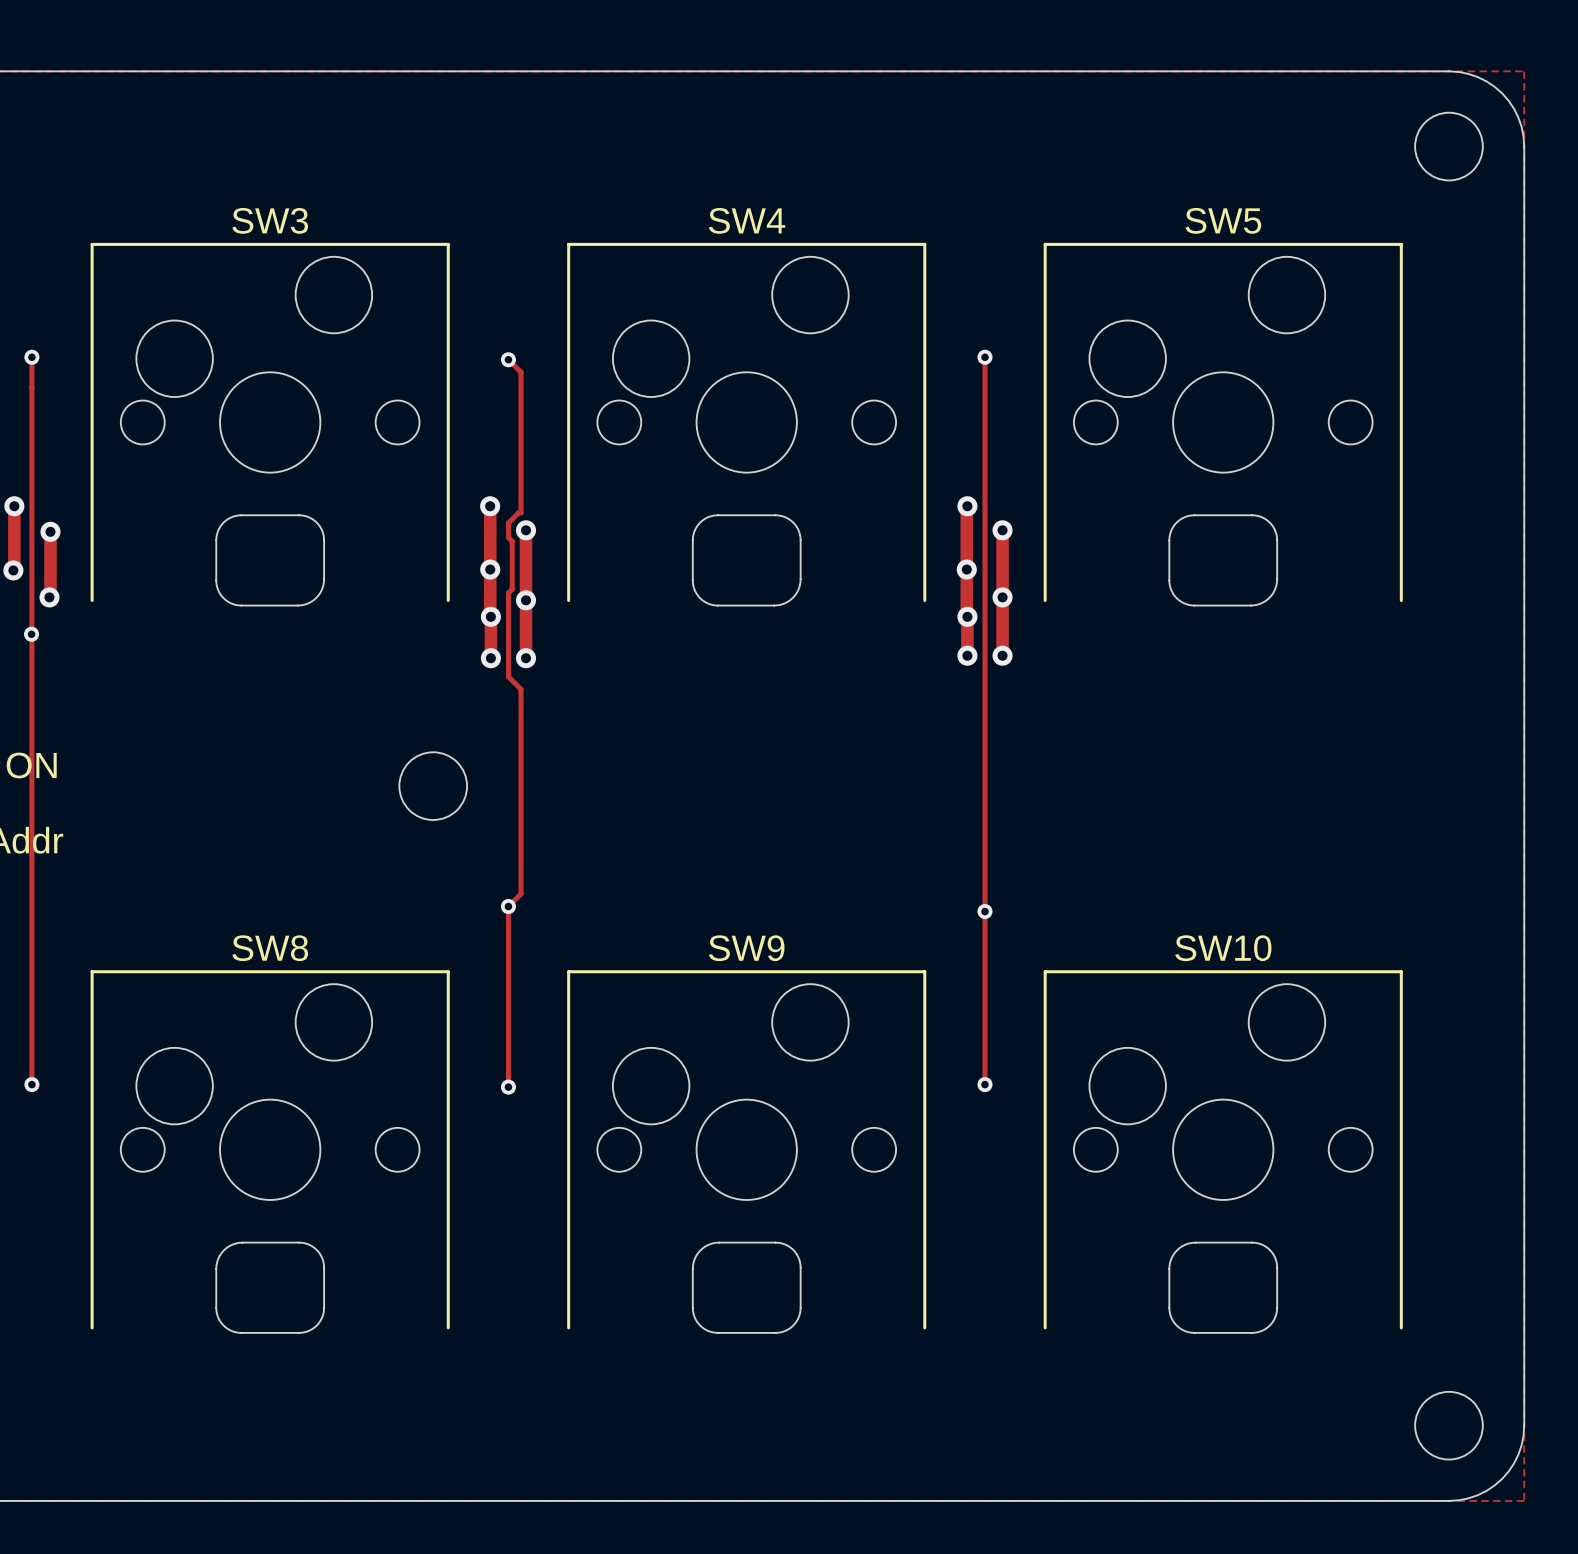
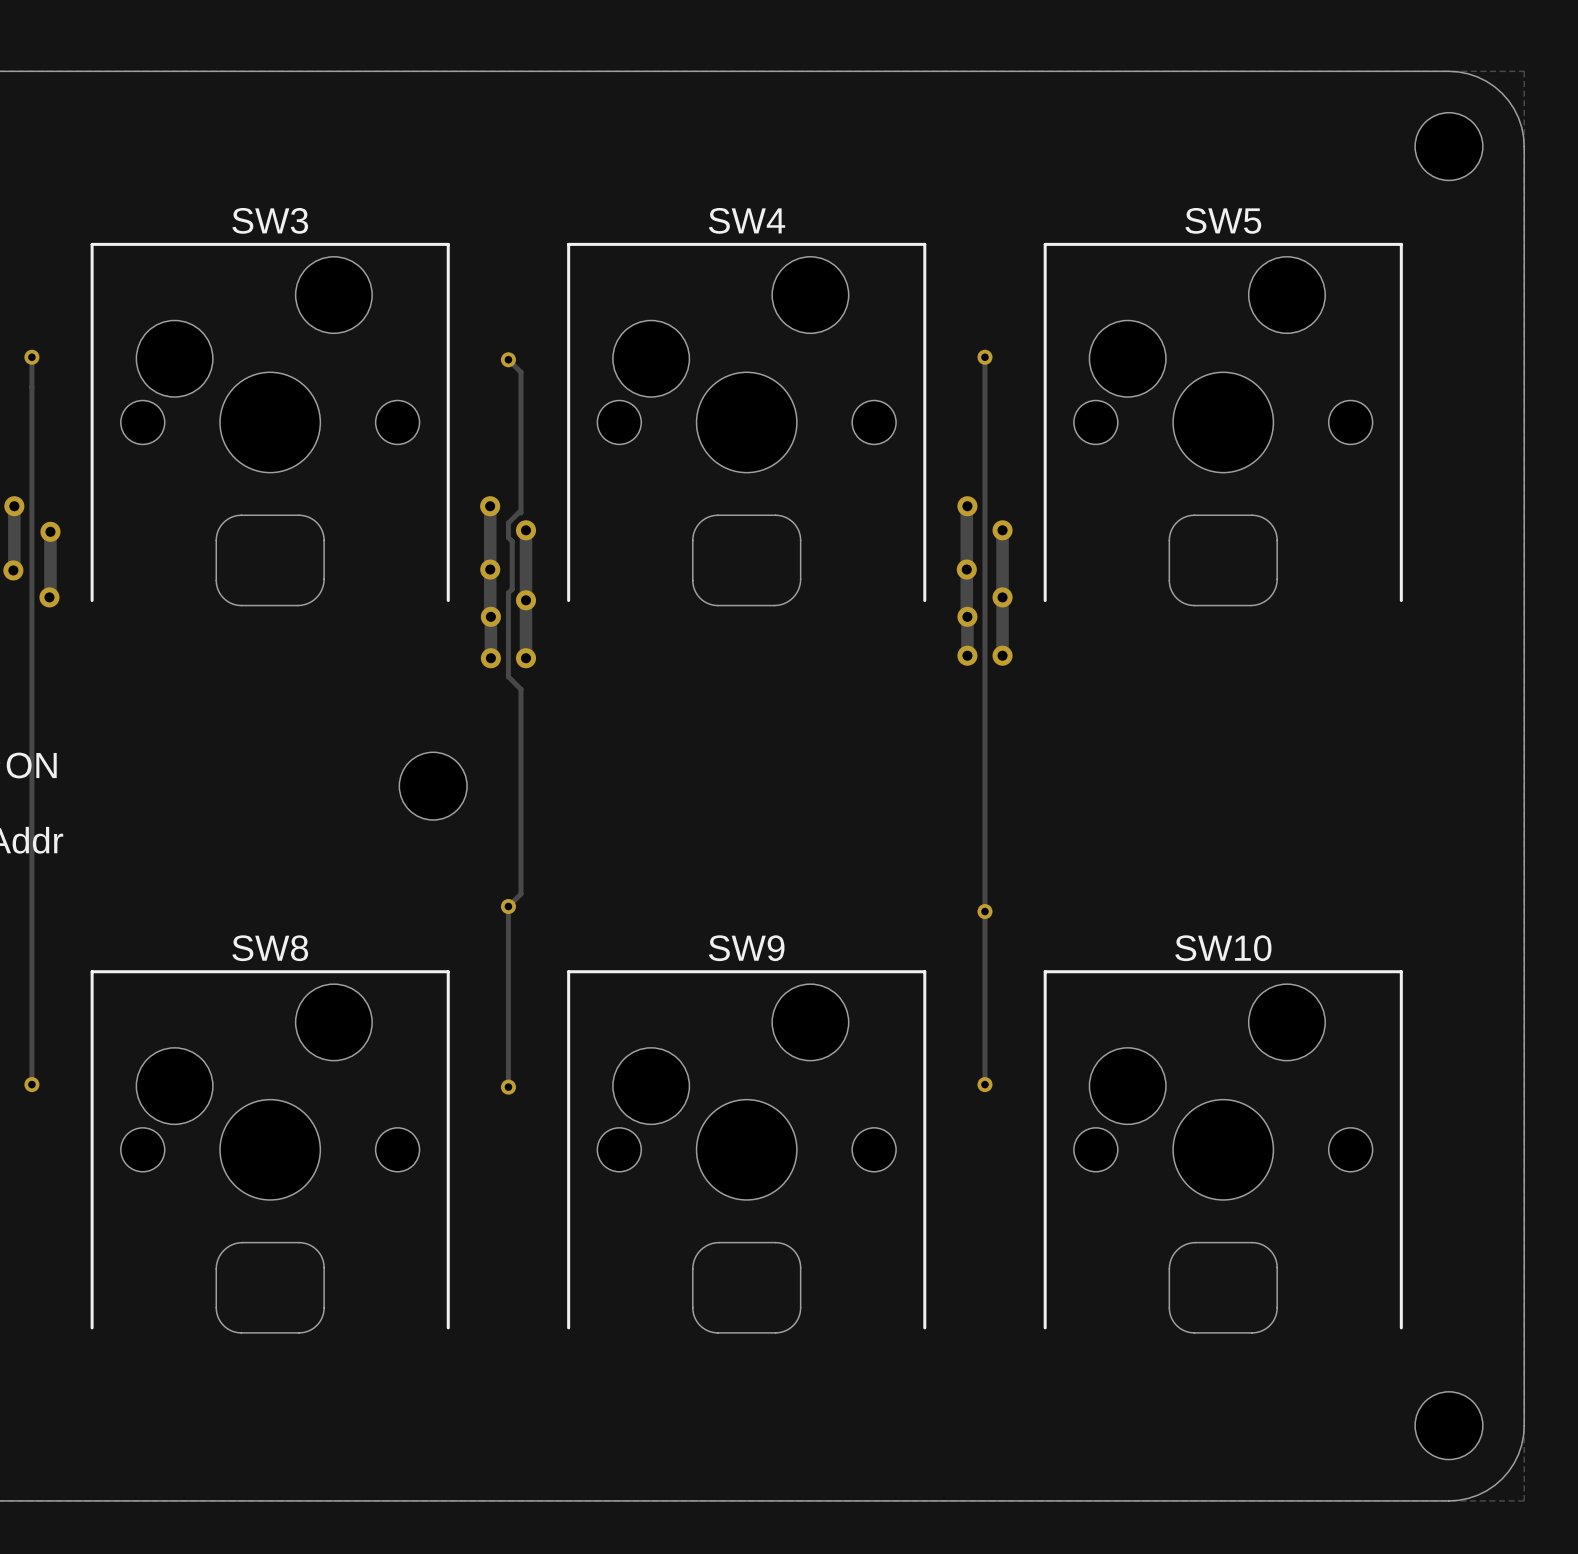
via: (31, 634) -> none

